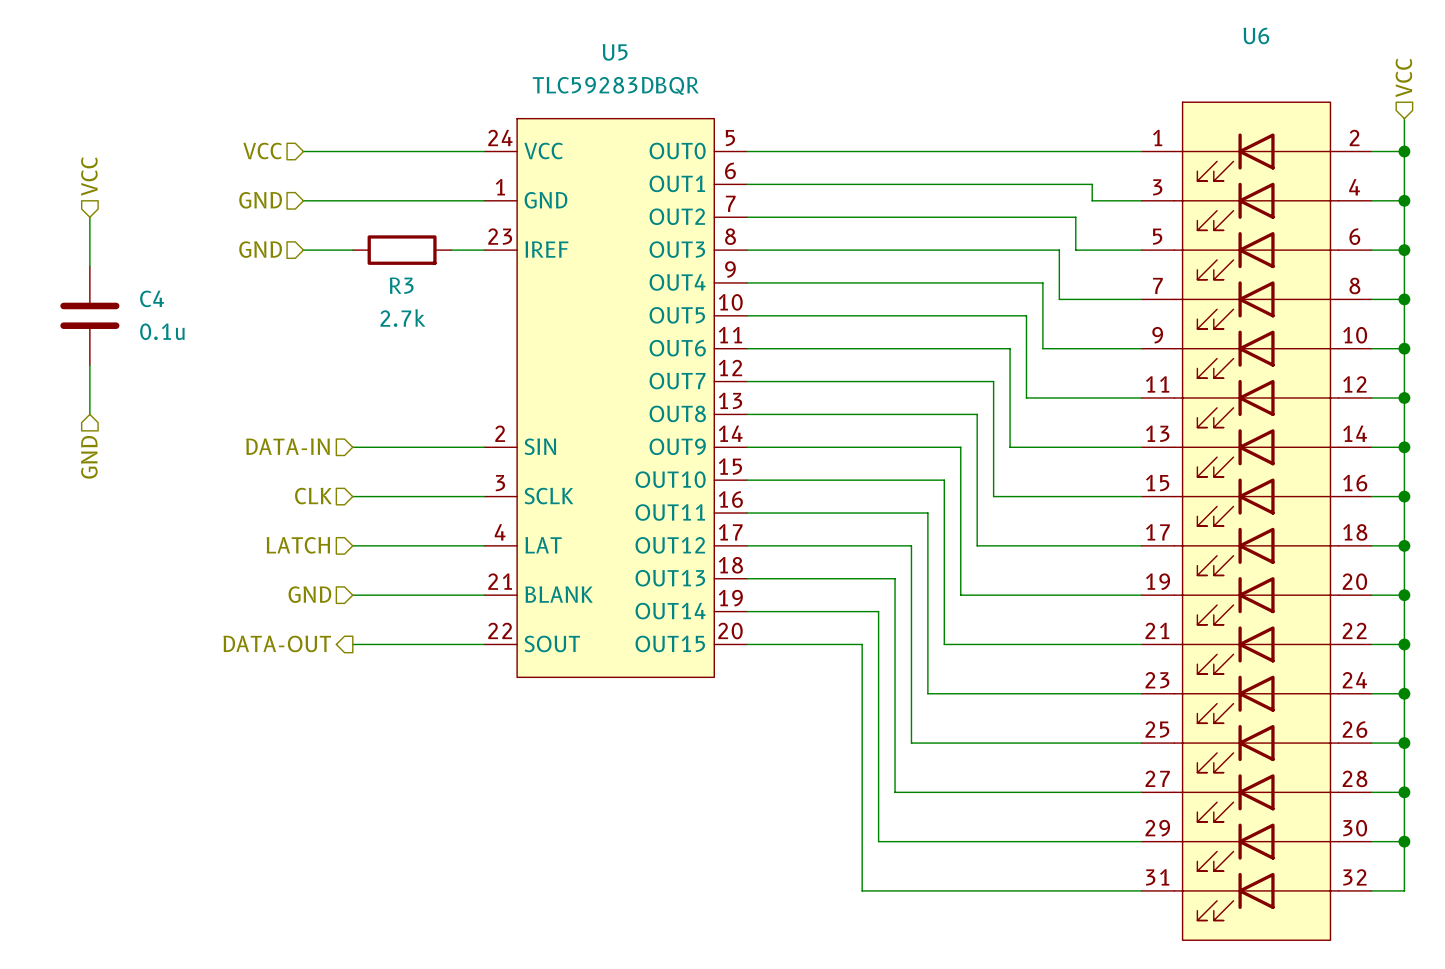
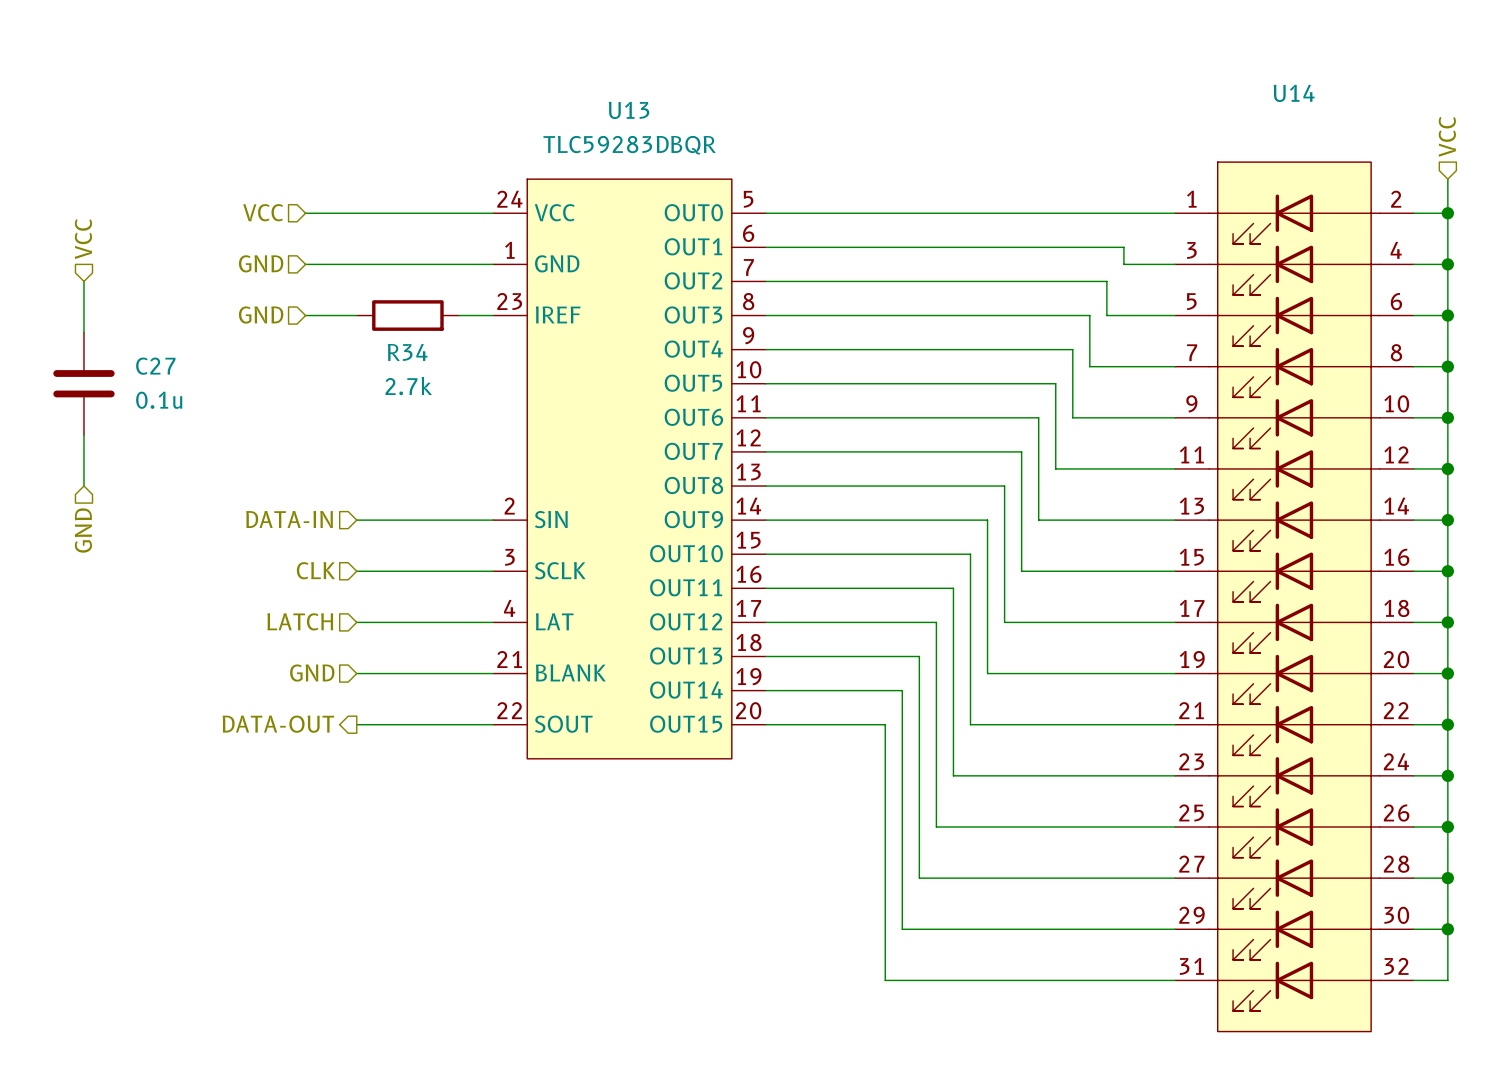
U6 name: U6 (1256, 35) -> U14 (1294, 93)
U5 name: U5 (615, 52) -> U13 (629, 110)
R3 name: R3 (401, 285) -> R34 (407, 352)
C4 name: C4 (152, 298) -> C27 (155, 366)

